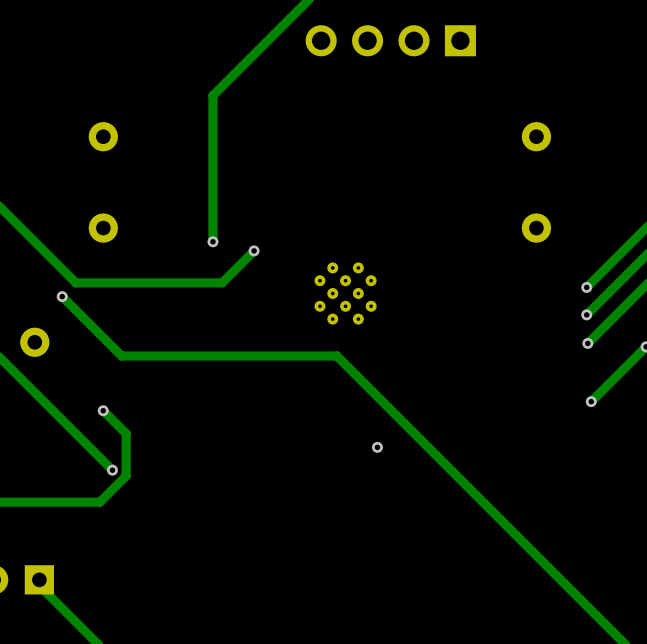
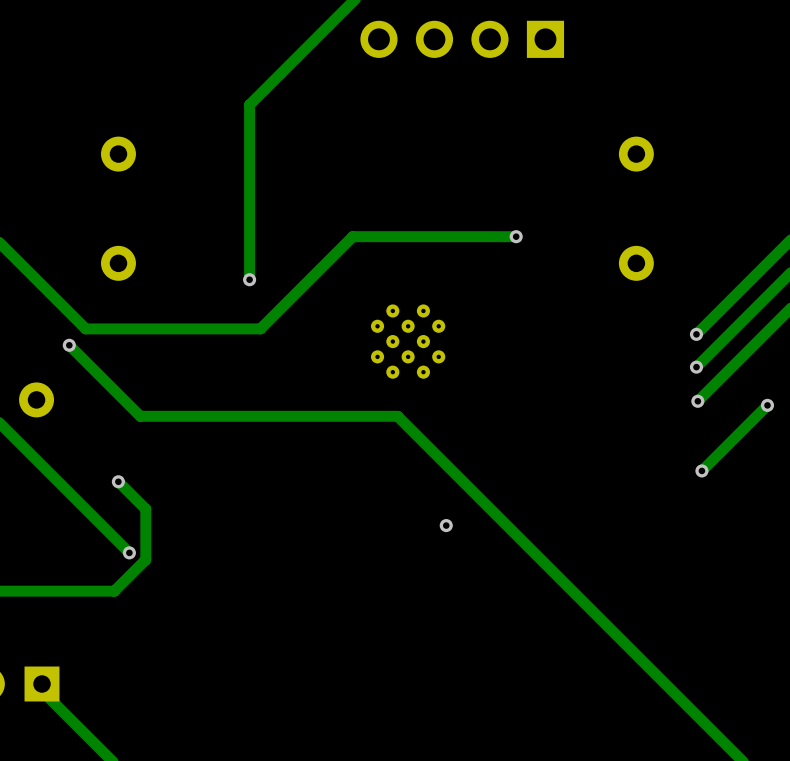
track: none -> (516, 236) (352, 236) (298, 290)
via: none -> (516, 236)
via: (254, 250) -> none

